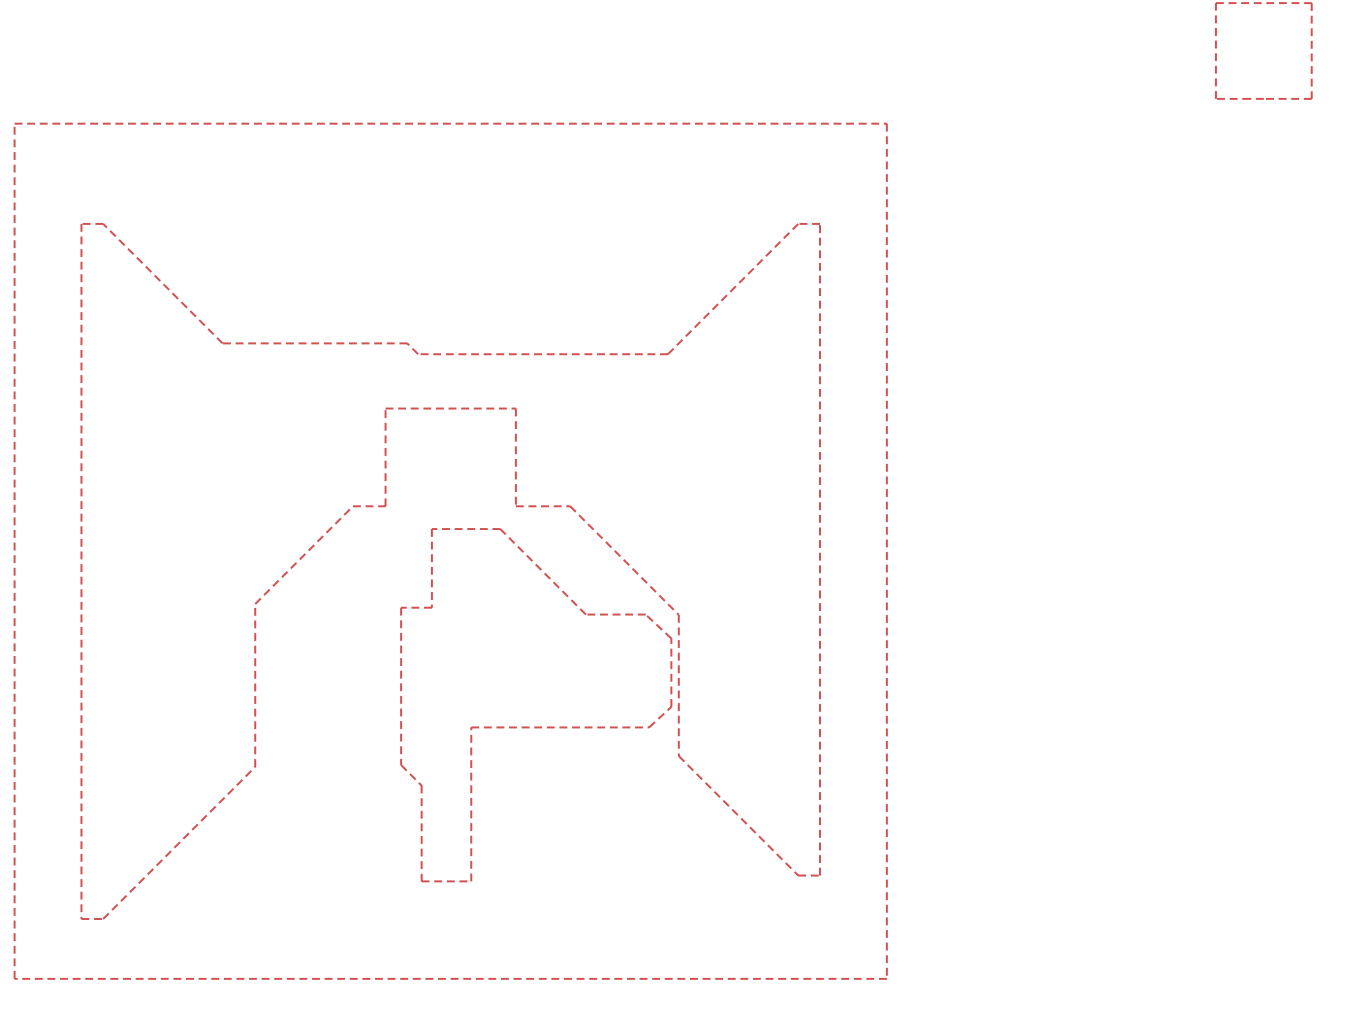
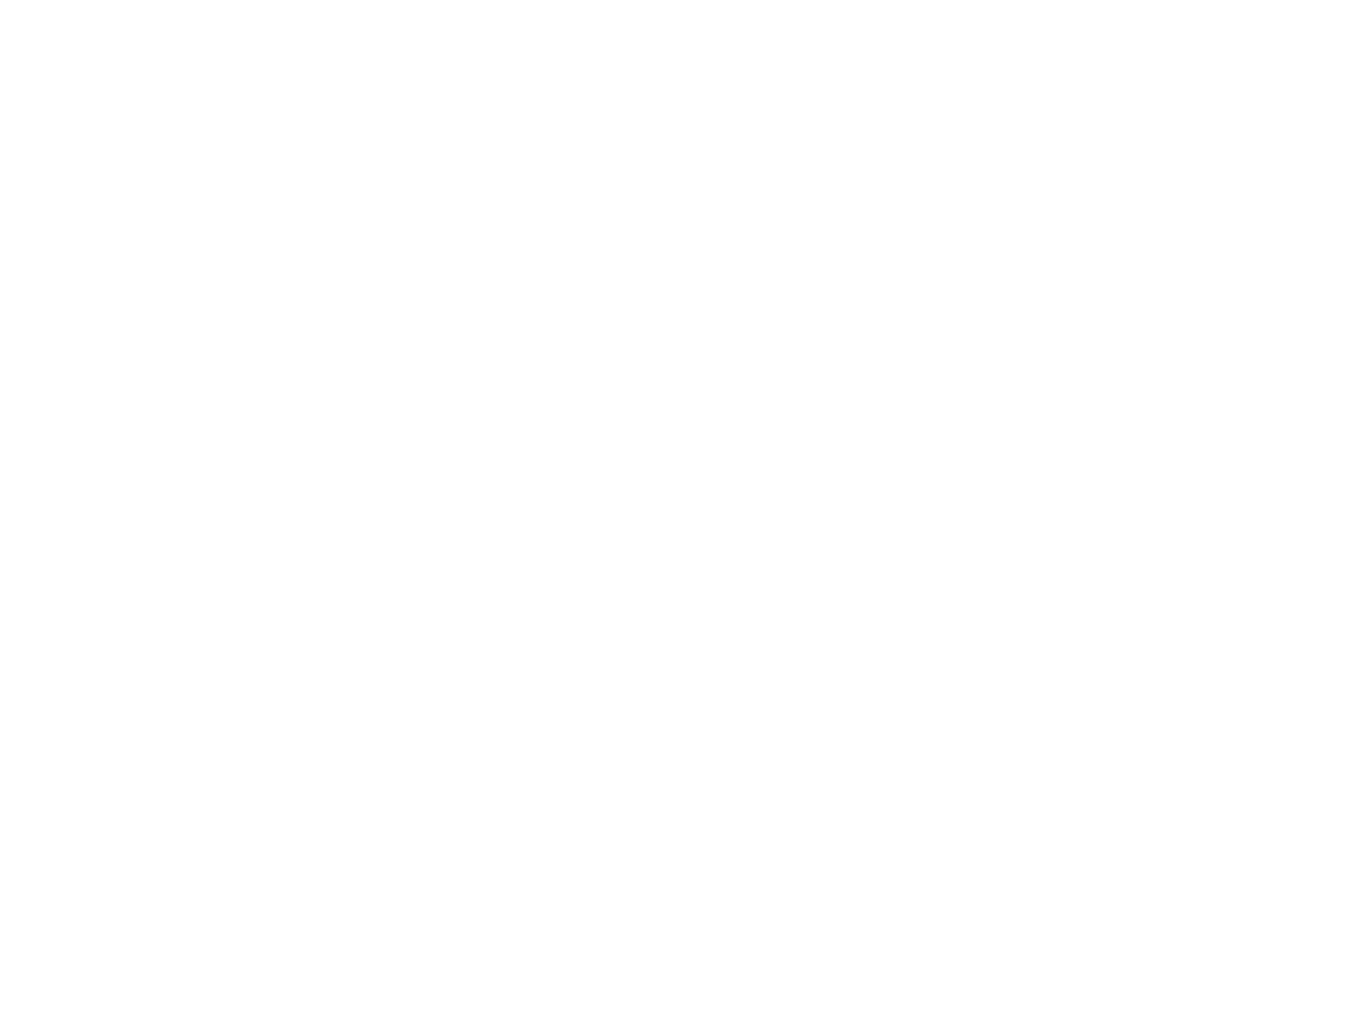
zone outline: (1215, 3) (1311, 3) (1311, 98) (1215, 98) (1215, 3) -> none
zone outline: (14, 123) (886, 123) (886, 978) (14, 978) (14, 123) -> none
zone outline: (81, 223) (103, 223) (222, 343) (407, 343) (418, 354) (667, 354) (798, 223) (819, 223) (819, 875) (798, 875) (678, 756) (678, 614) (570, 506) (515, 506) (515, 408) (385, 408) (385, 506) (352, 506) (255, 604) (255, 766) (103, 919) (81, 919) (81, 223) -> none
zone outline: (431, 529) (500, 529) (585, 614) (645, 614) (671, 638) (671, 706) (649, 727) (471, 727) (471, 881) (421, 881) (421, 785) (401, 765) (401, 607) (431, 607) (431, 529) -> none

